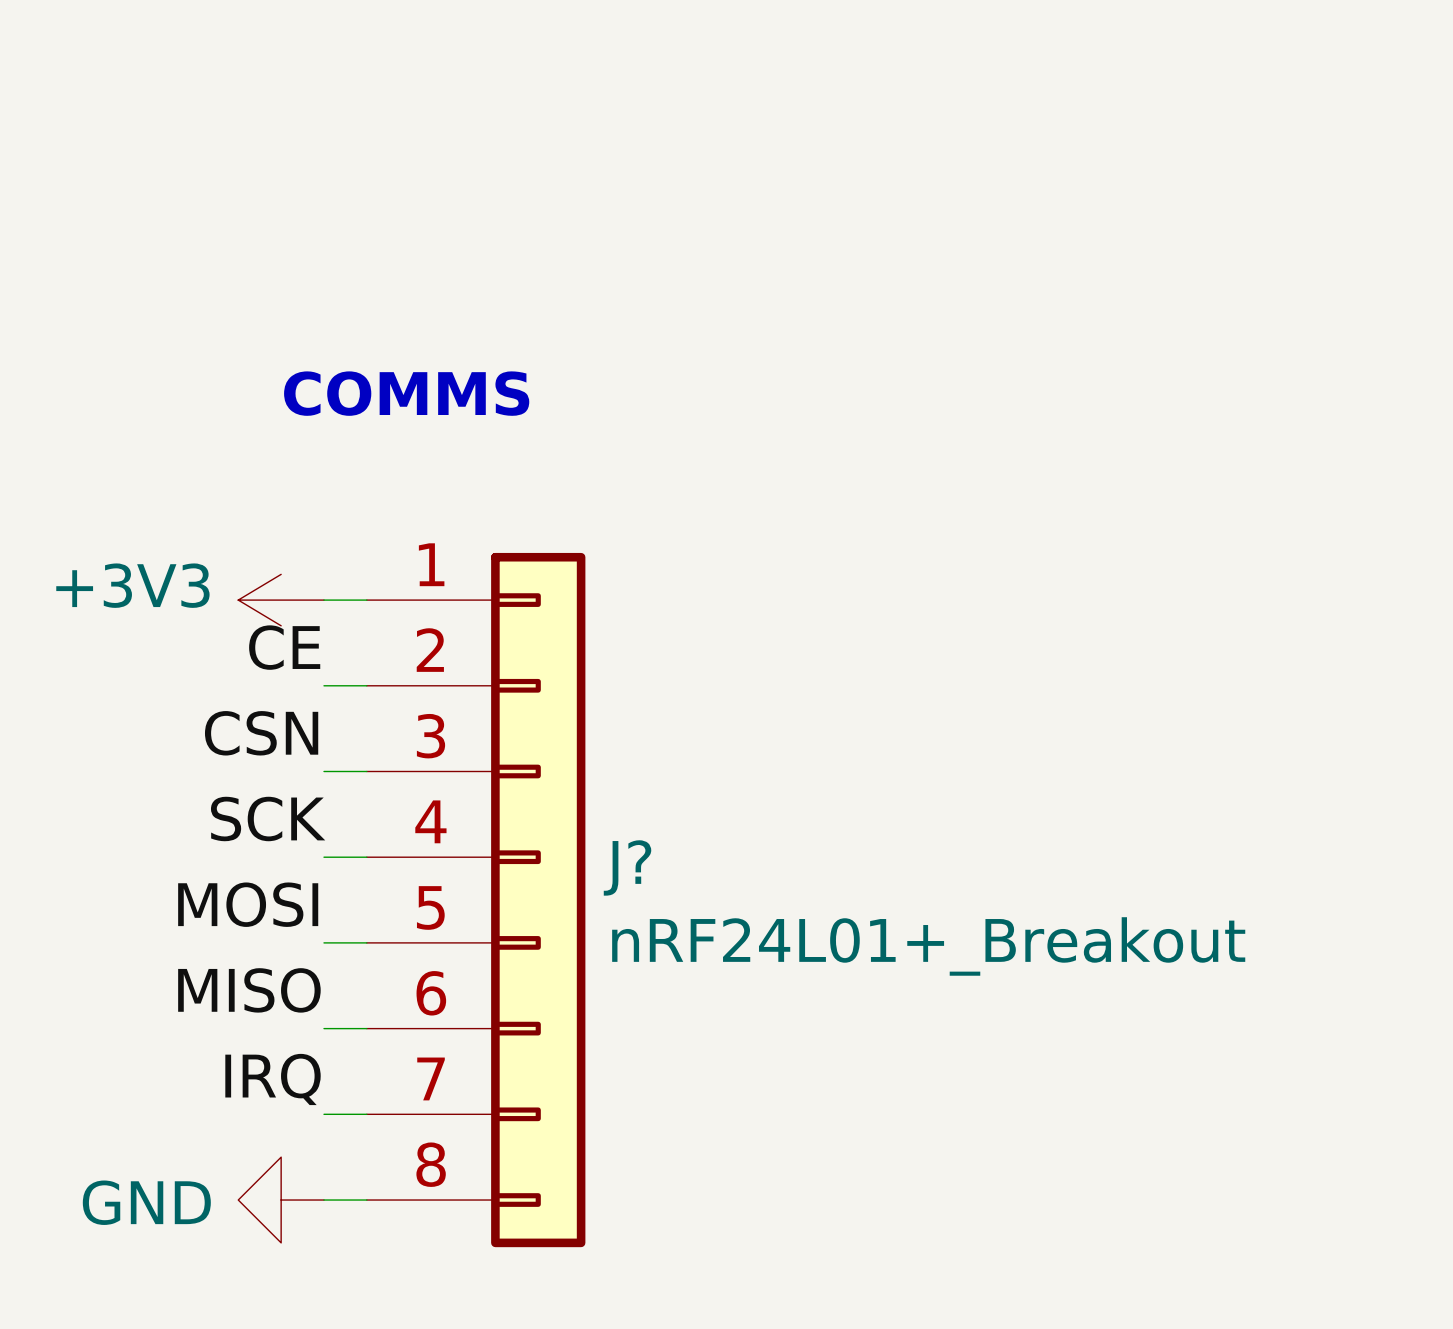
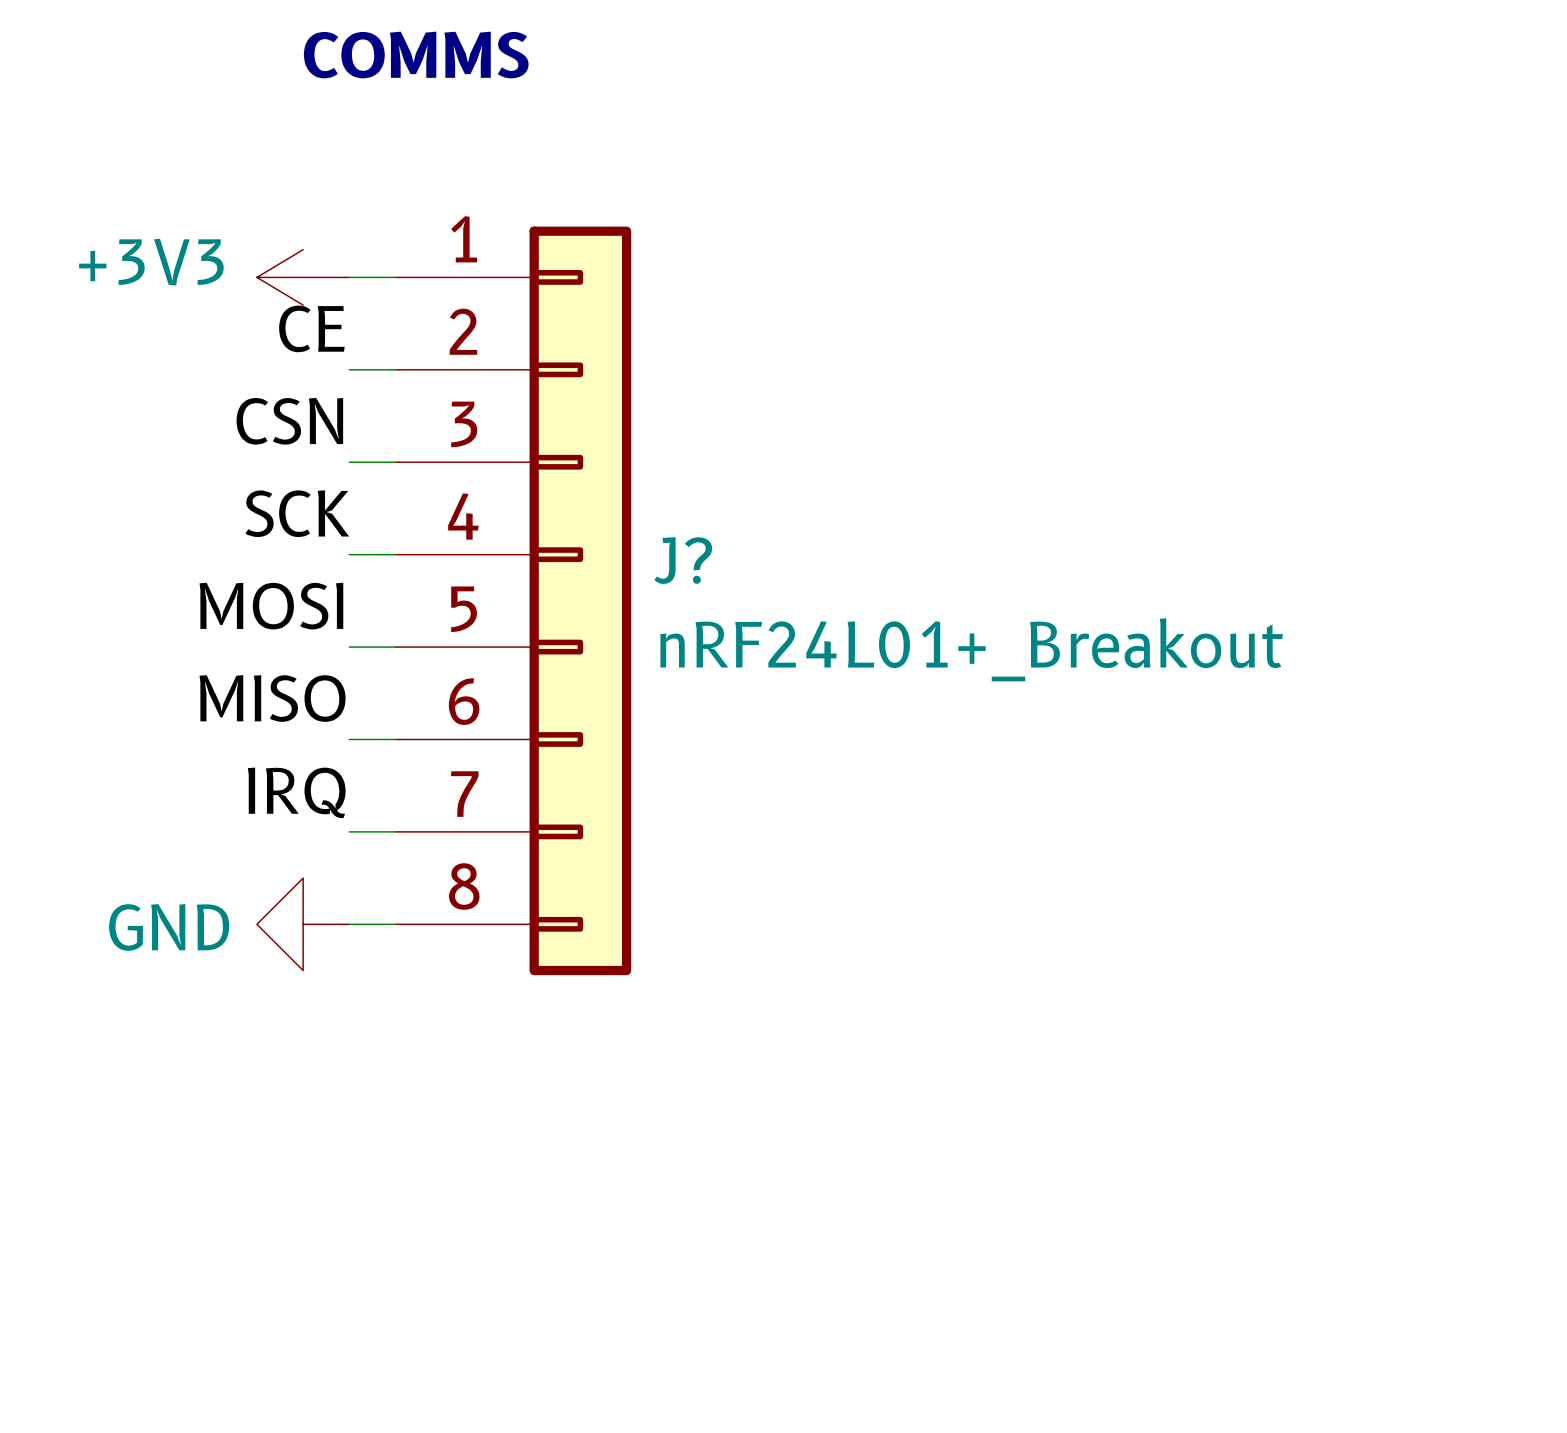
label: none -> CE (311, 328)
label: none -> CSN (289, 421)
text position: COMMS (406, 393) -> COMMS (416, 55)
power symbol position: +3V3 (281, 600) -> +3V3 (303, 277)
label: CE (284, 647) -> MISO (272, 698)
label: CSN (261, 733) -> IRQ (296, 792)
label position: SCK (268, 818) -> SCK (297, 513)
J? position: (476, 900) -> (513, 600)
label position: MOSI (248, 904) -> MOSI (271, 606)
wire: (323, 942) (366, 942) -> (349, 277) (395, 277)
label: MISO (249, 990) -> none
wire: (323, 1028) (366, 1028) -> (349, 369) (395, 369)
label: IRQ (273, 1079) -> none
wire: (323, 1114) (366, 1114) -> (349, 462) (395, 462)
power symbol position: GND (281, 1200) -> GND (303, 924)
wire: (323, 1200) (366, 1200) -> (349, 554) (395, 554)

